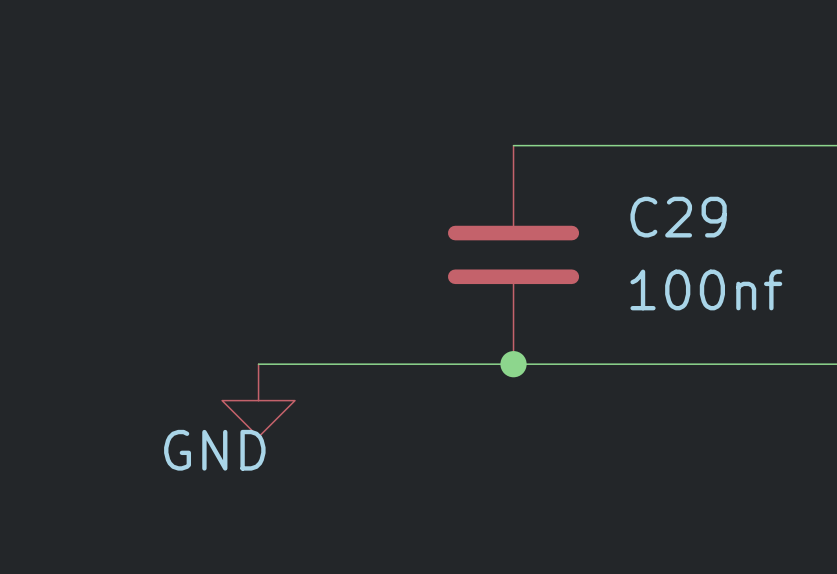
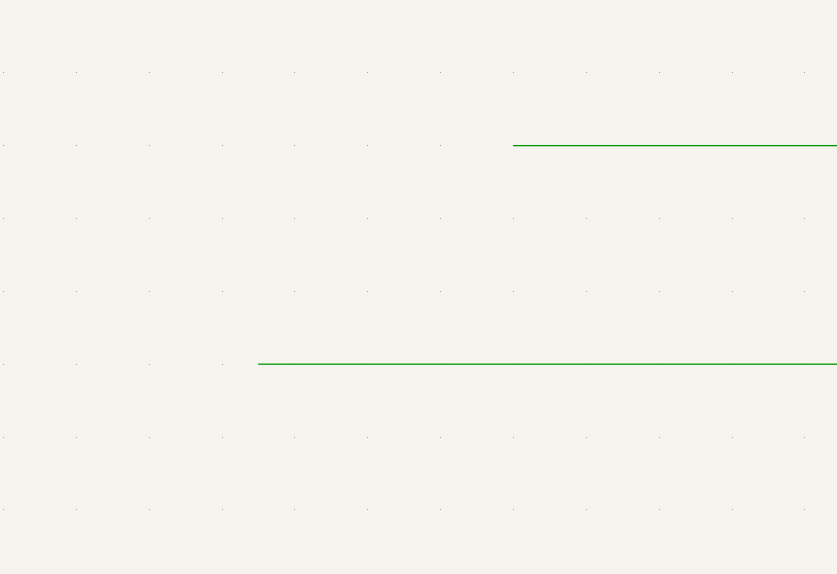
C29: 100nf (513, 254) -> none
junction: (513, 364) -> none
power symbol: GND (258, 400) -> none

